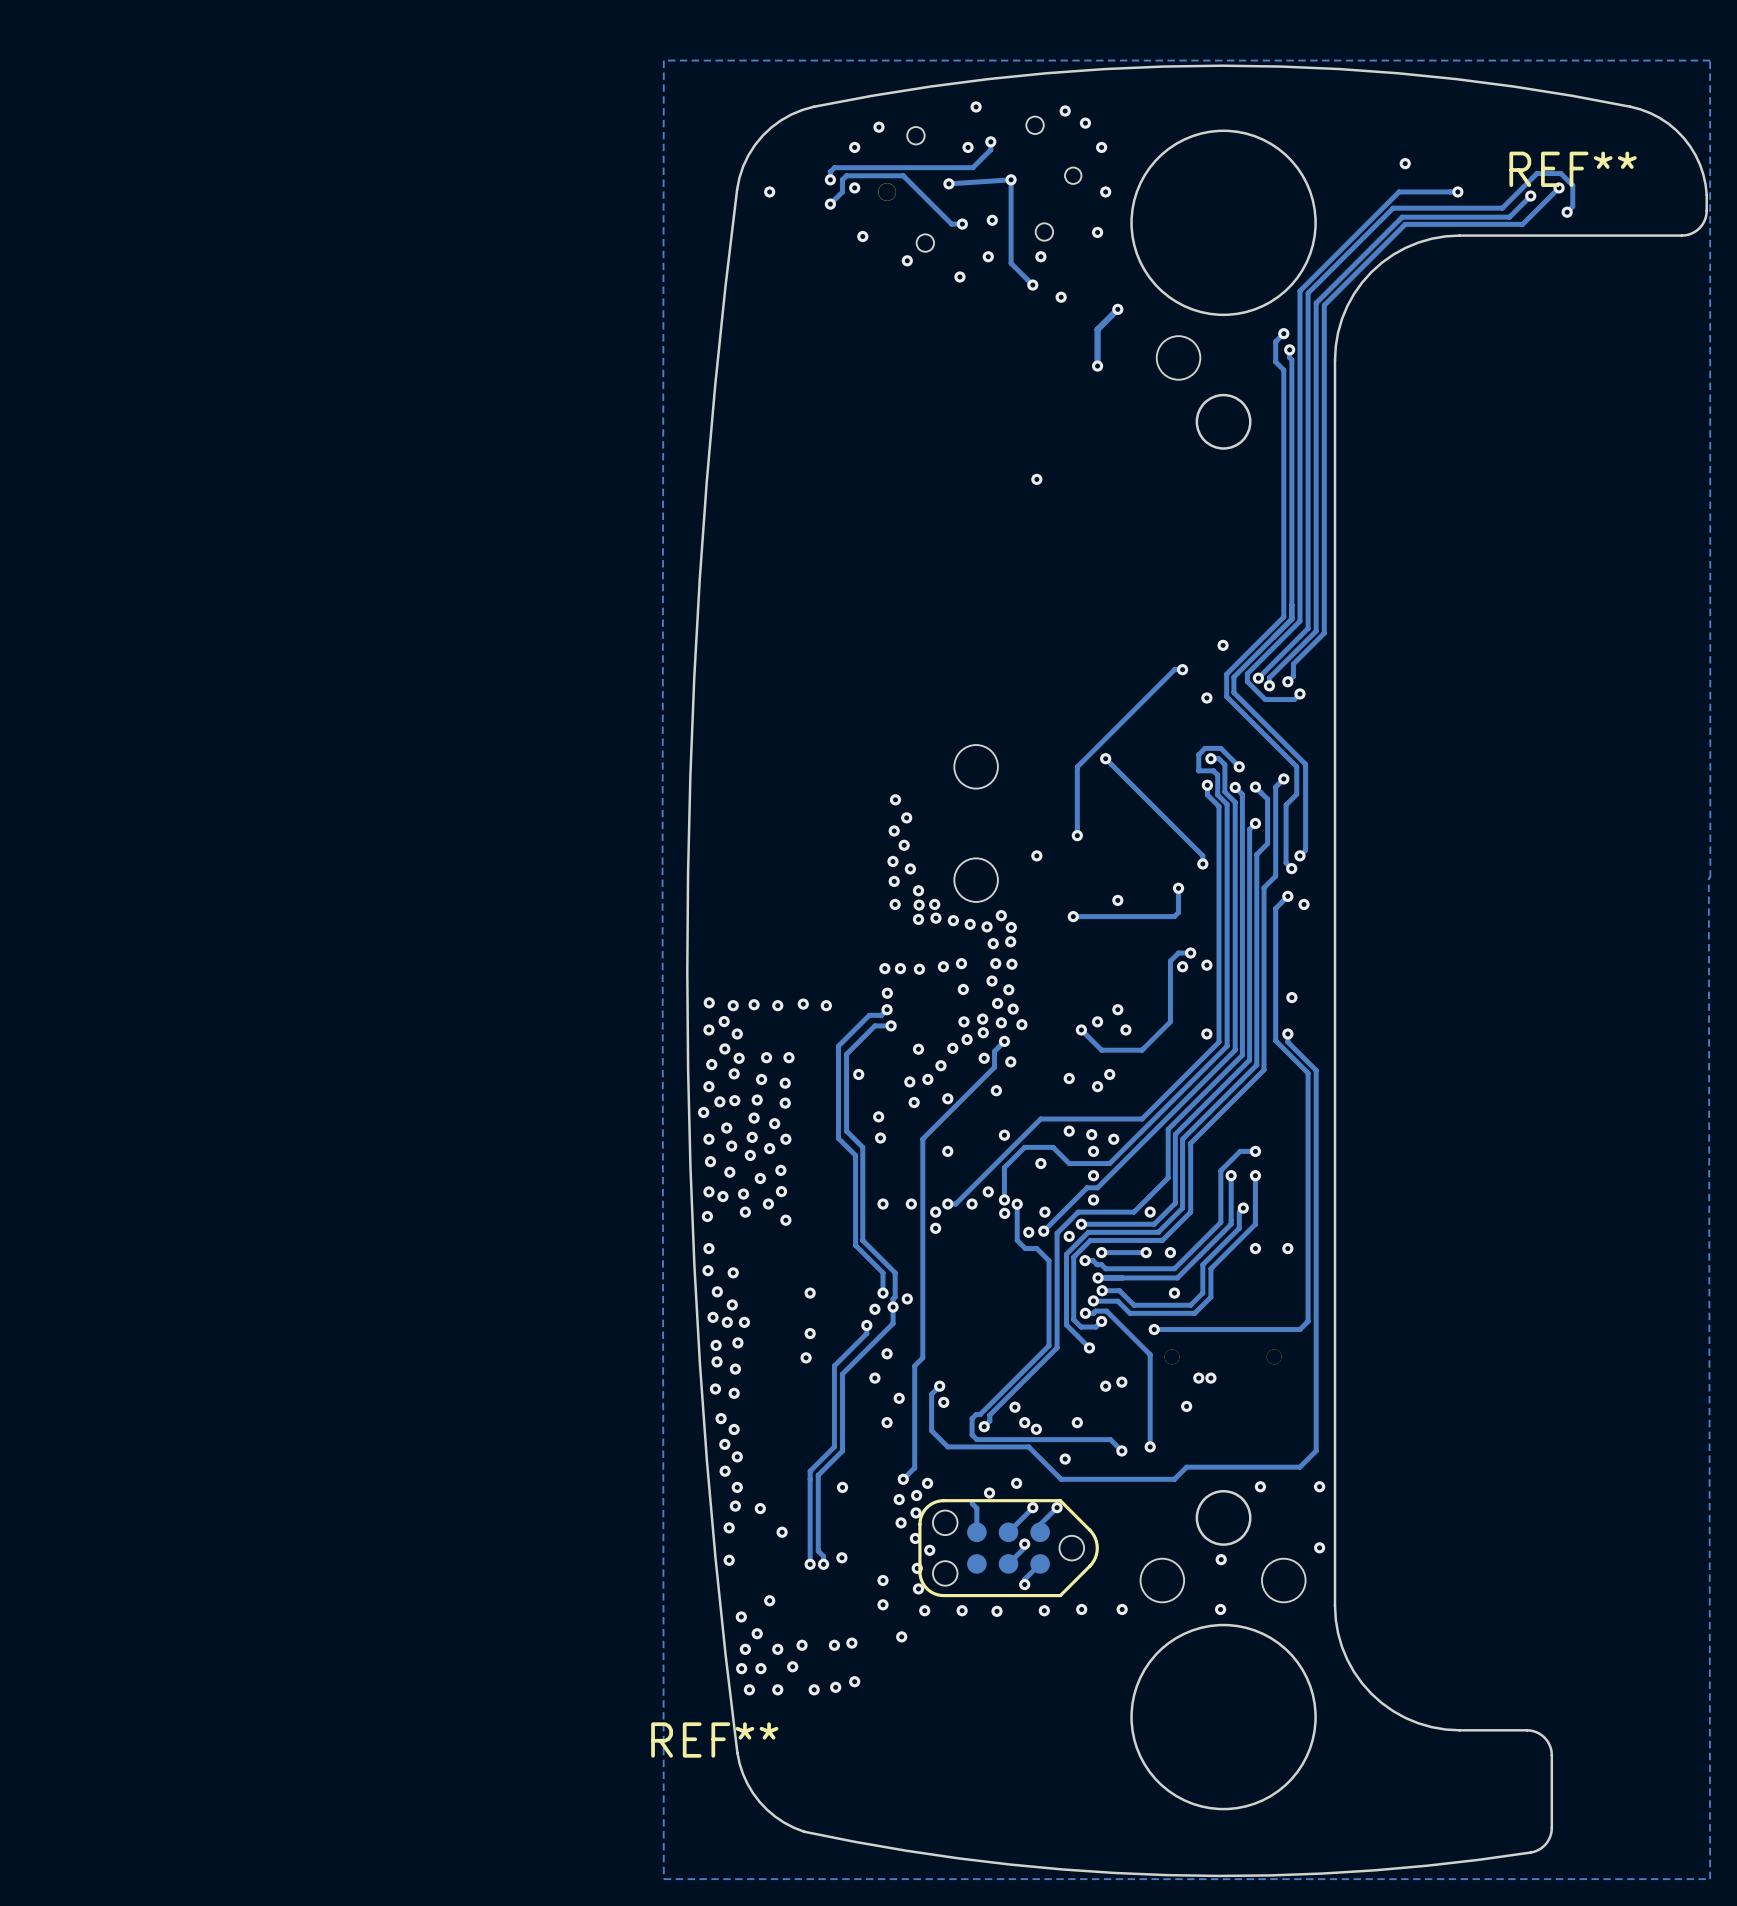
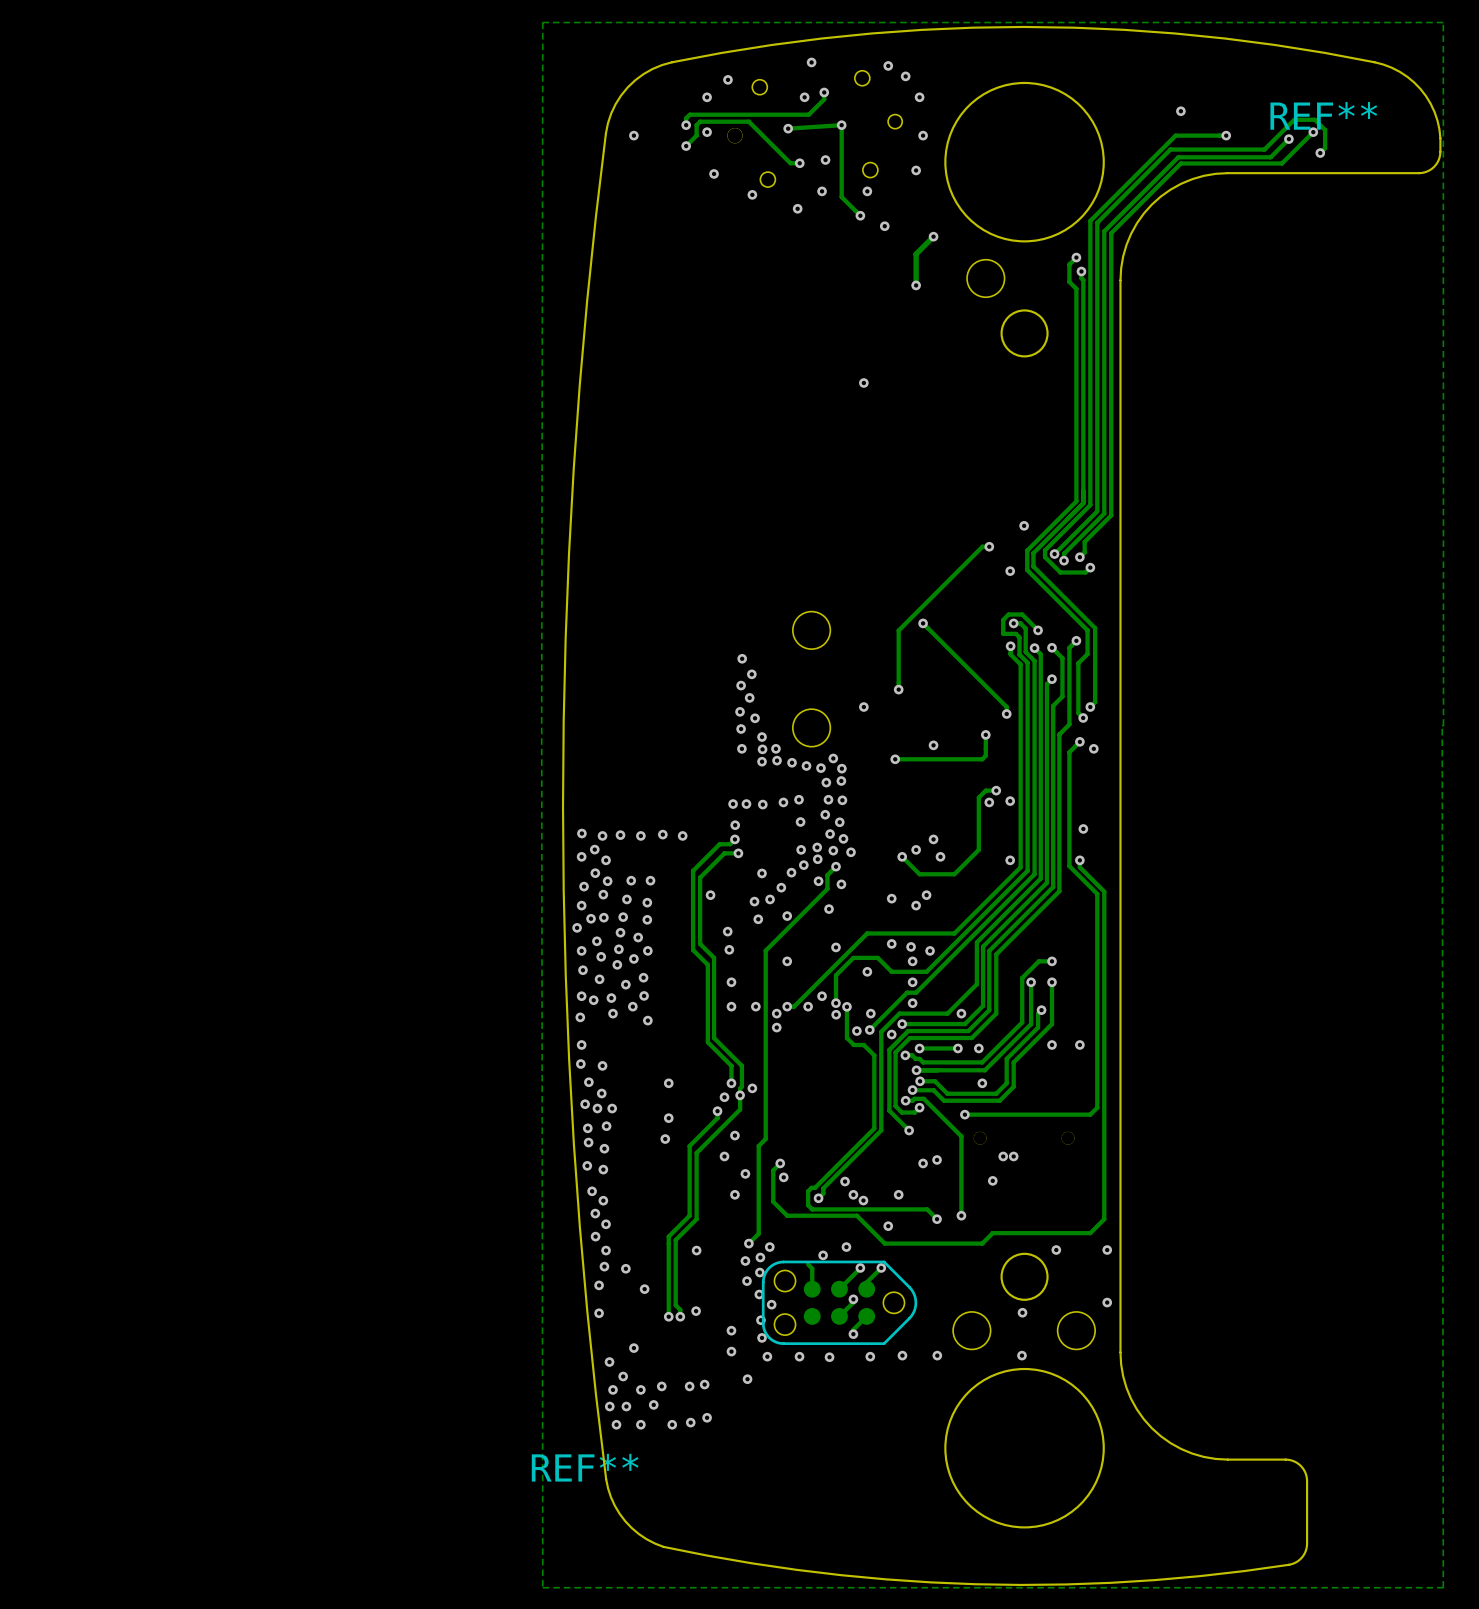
via: none -> (731, 982)

